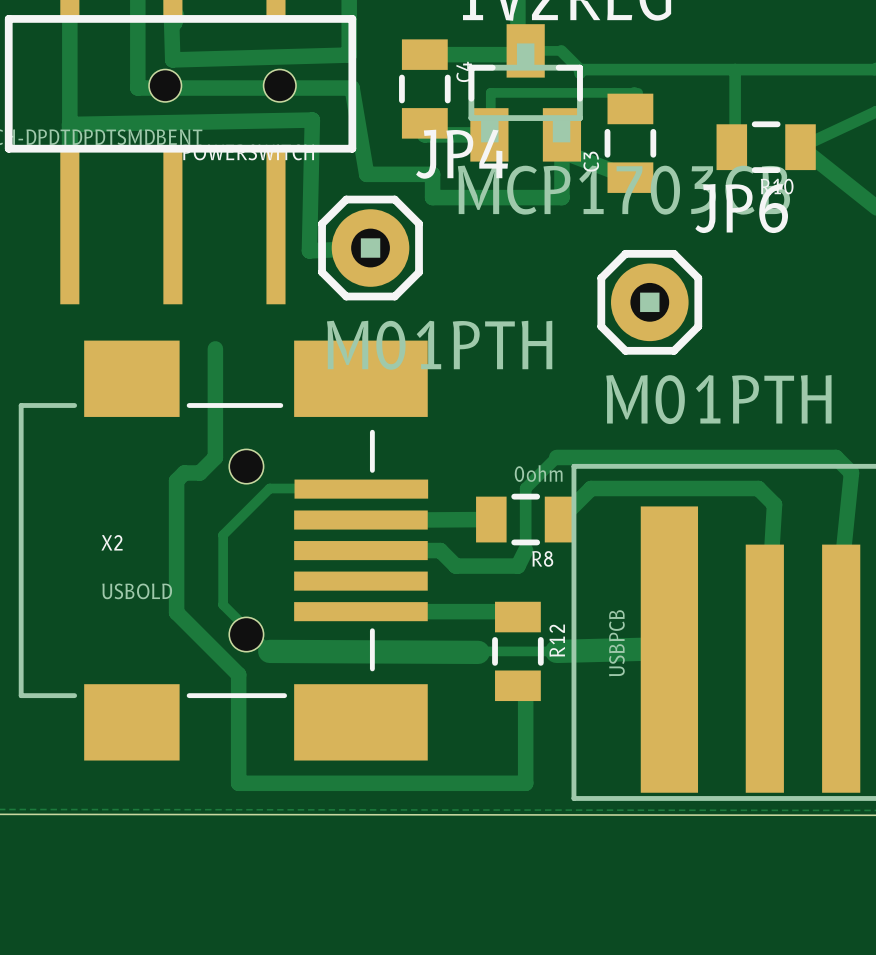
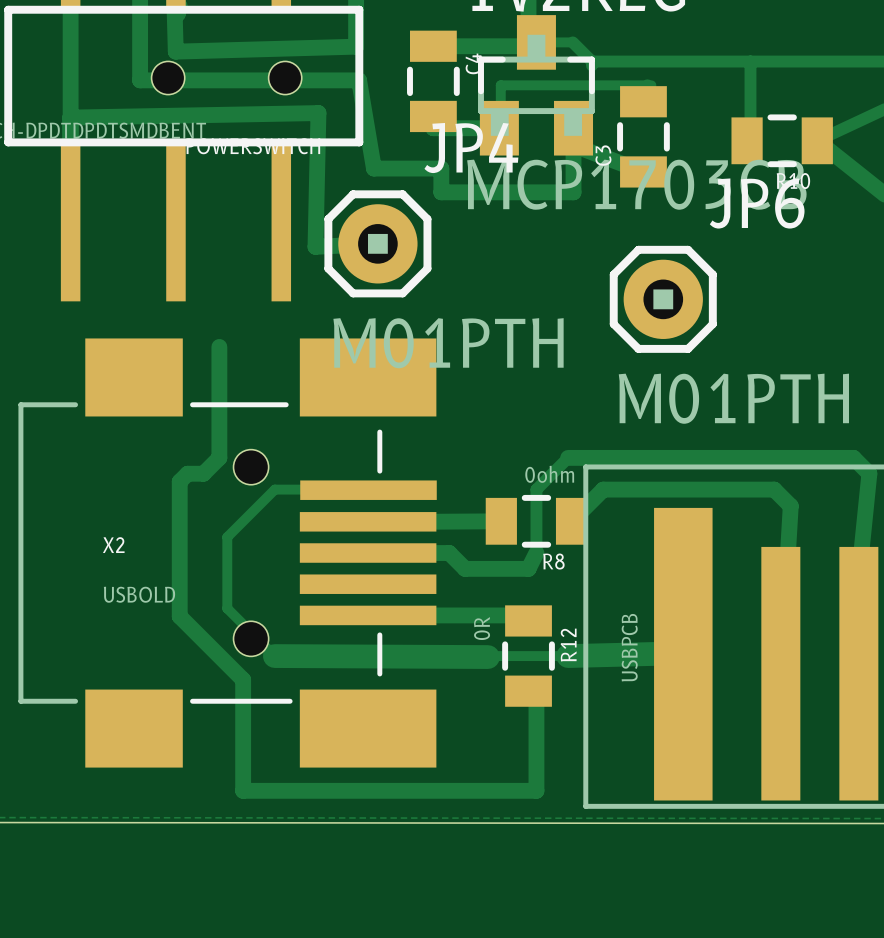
R12 value: none -> 0R (482, 628)

